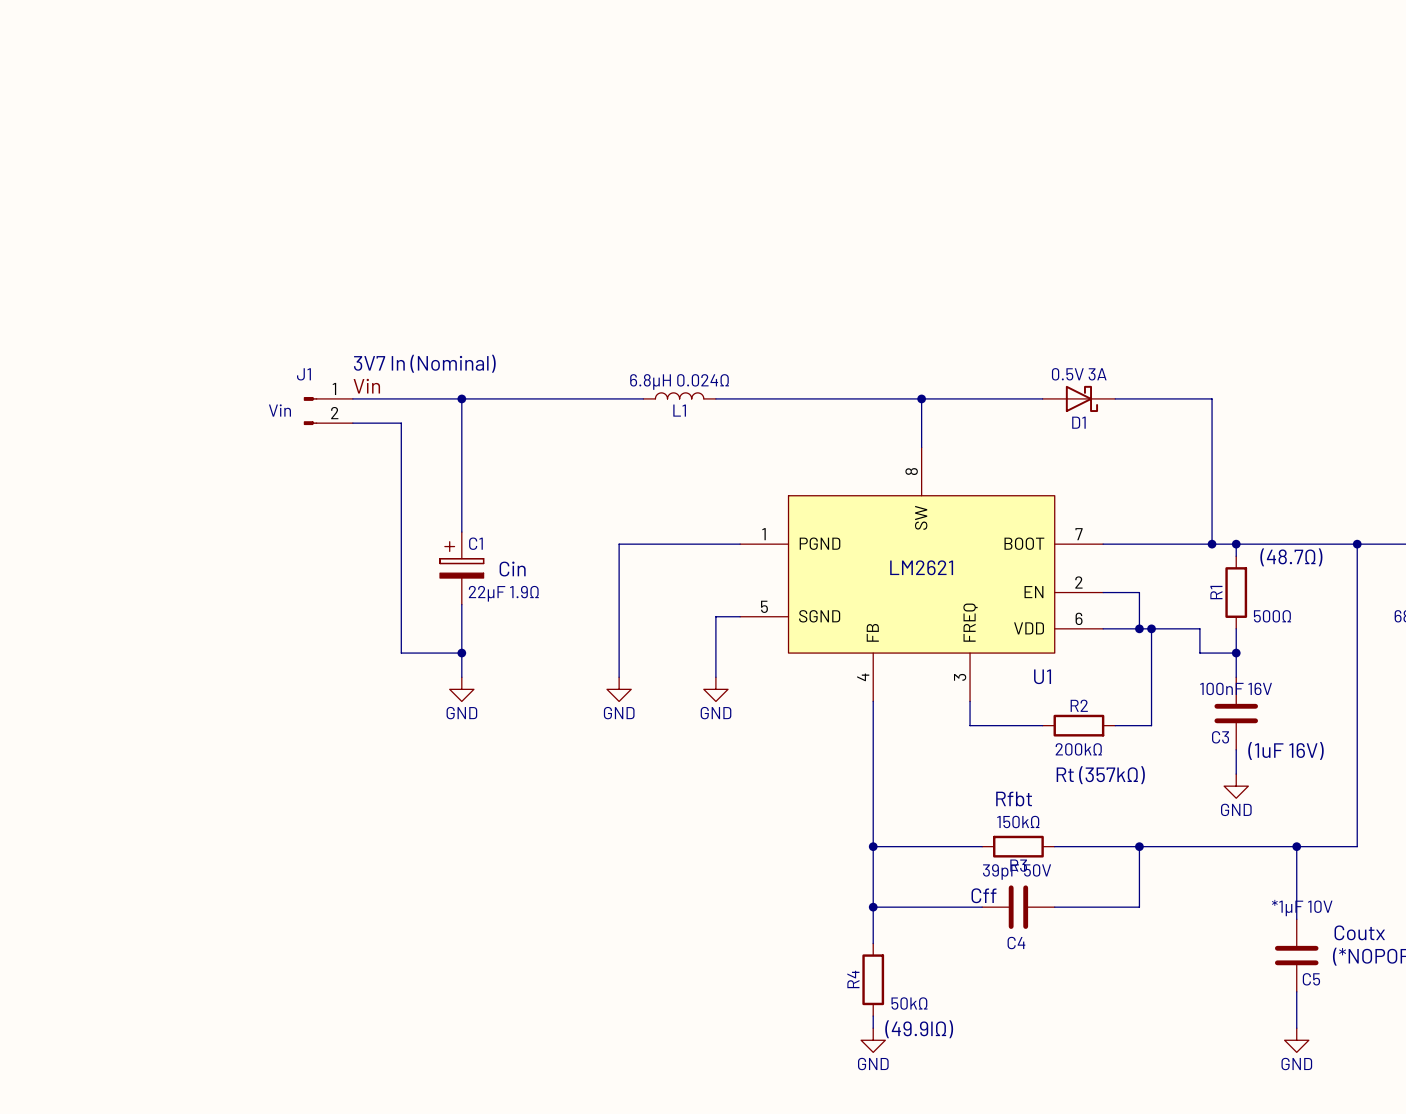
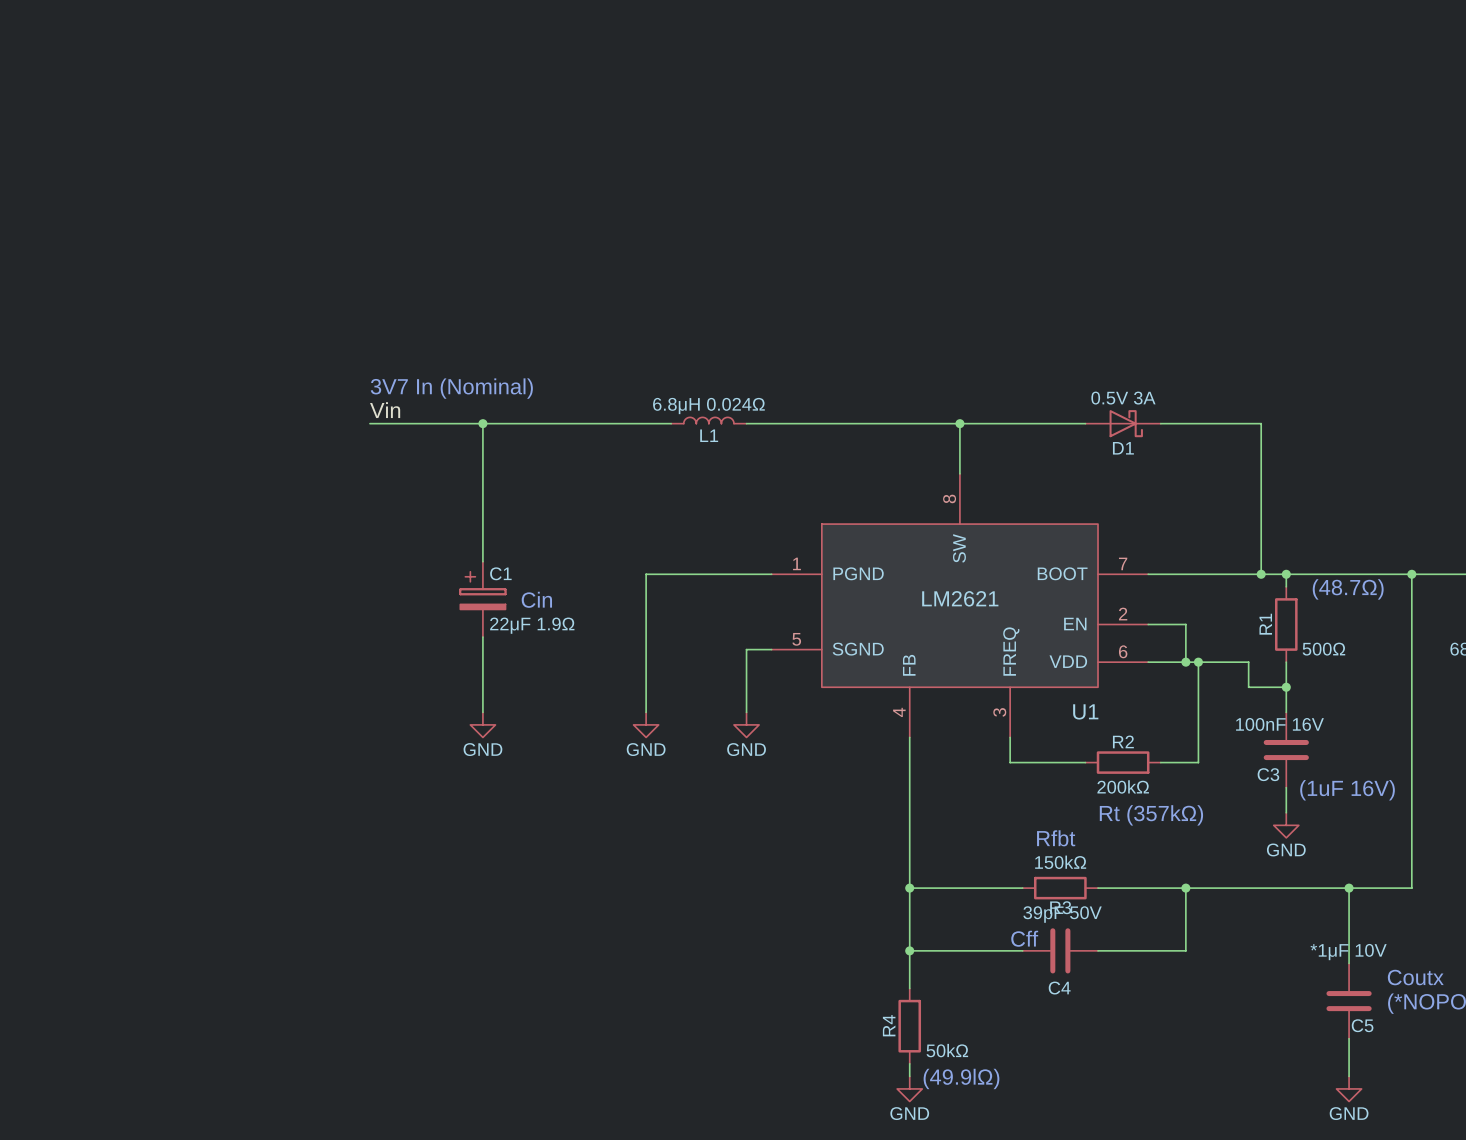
J1: Vin (328, 411) -> none
wire: (352, 423) (401, 423) (401, 653) (461, 653) -> none
junction: (461, 653) -> none

